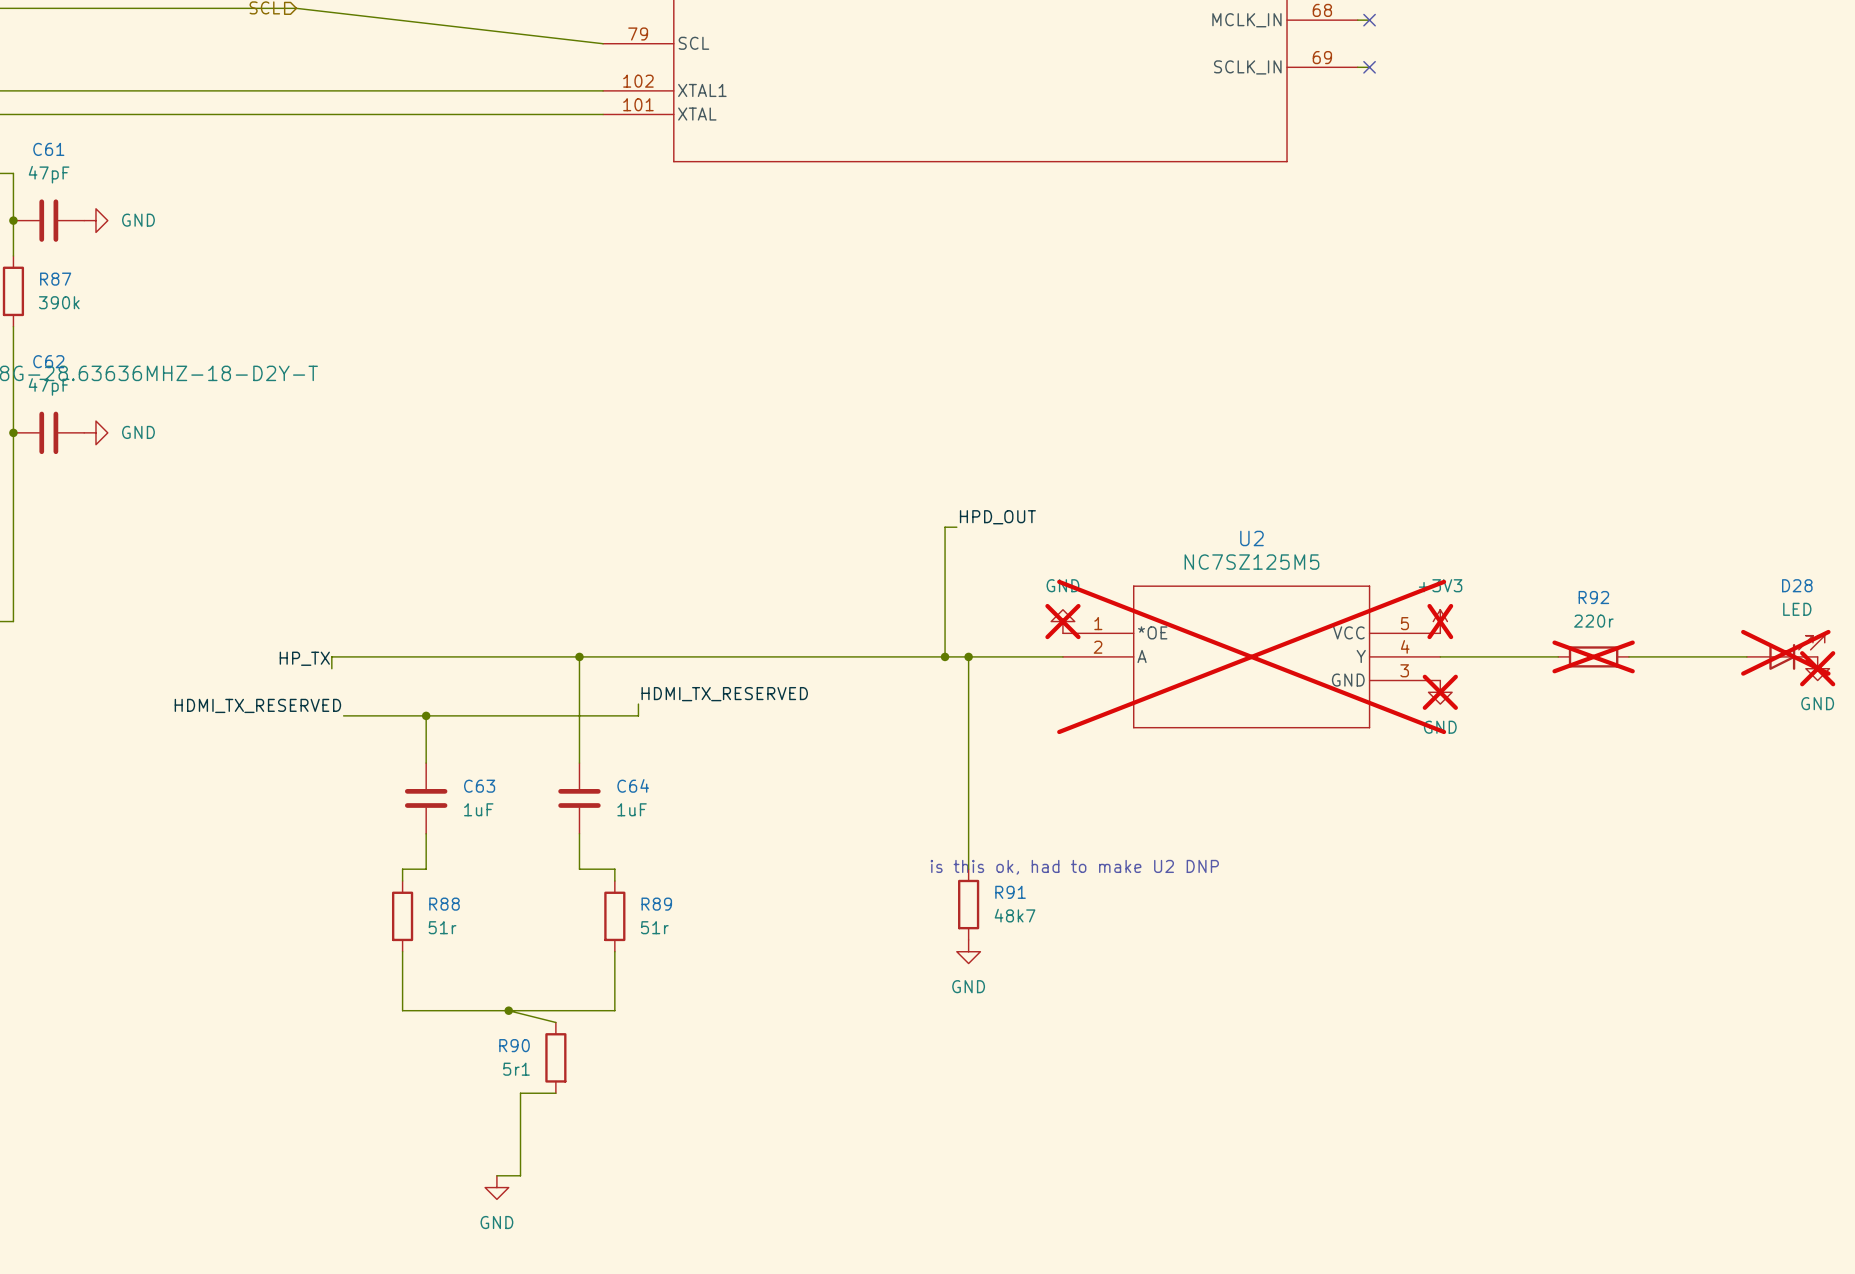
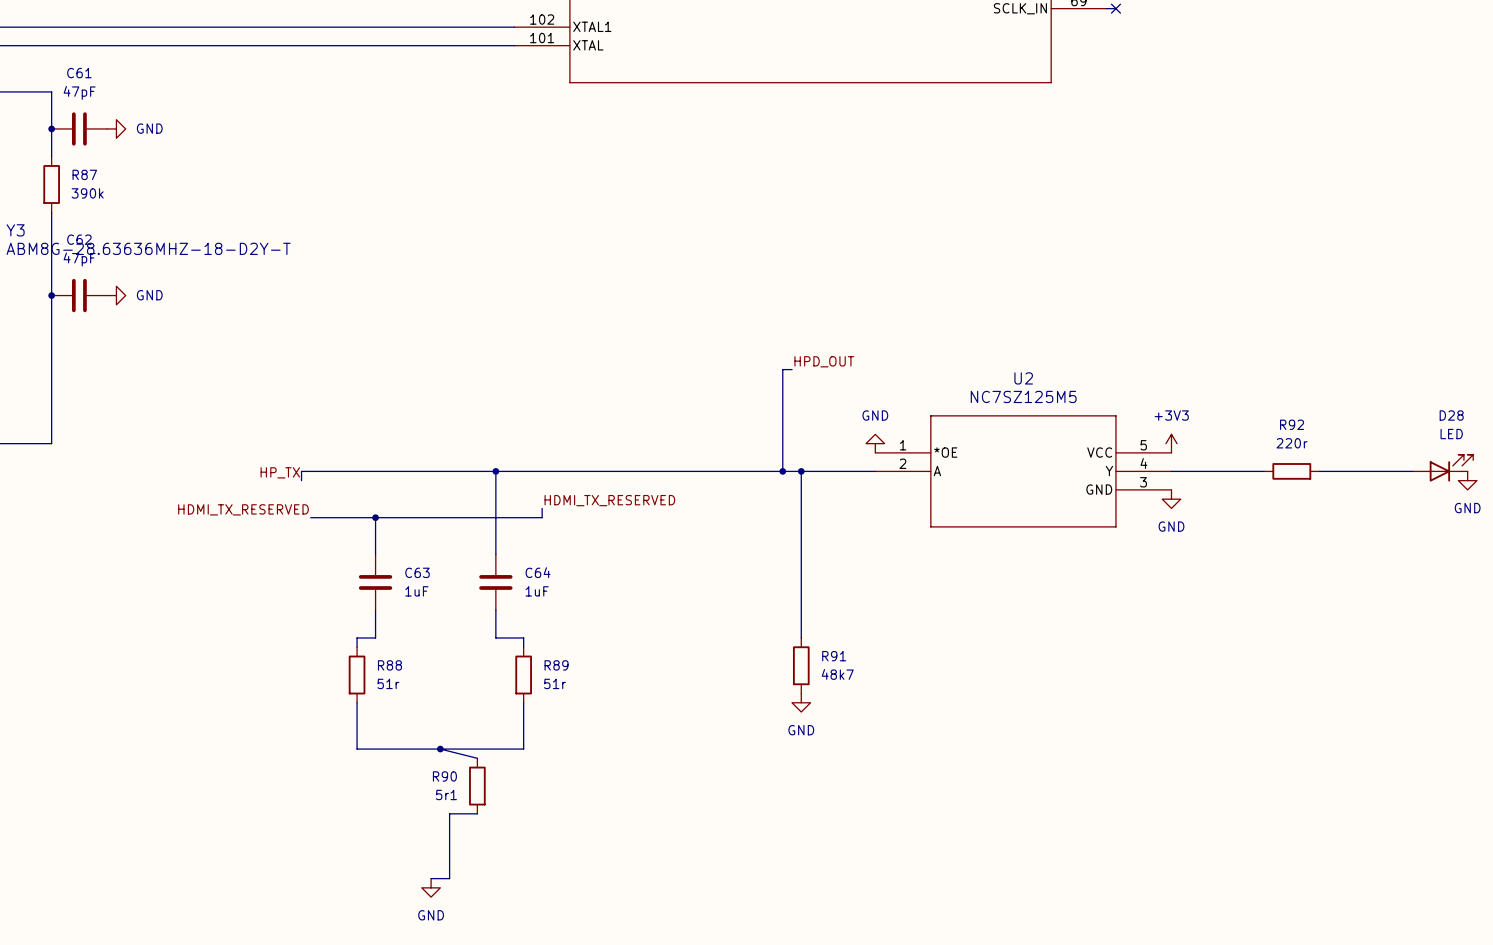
power symbol do-not-place cross: (1062, 621) -> none
power symbol do-not-place cross: (1440, 621) -> none
D28 do-not-place cross: (1785, 652) -> none
U2 do-not-place cross: (1251, 656) -> none
R92 do-not-place cross: (1593, 656) -> none
power symbol do-not-place cross: (1817, 668) -> none
power symbol do-not-place cross: (1440, 692) -> none
text: is this ok, had to make U2 DNP (1074, 867) -> none

